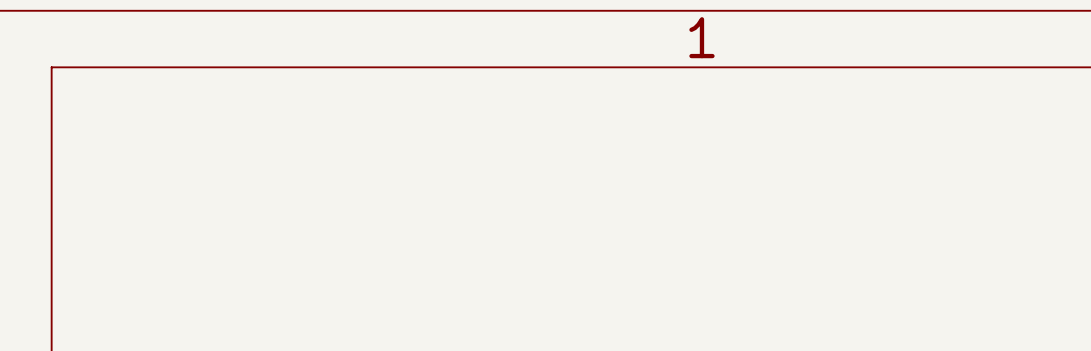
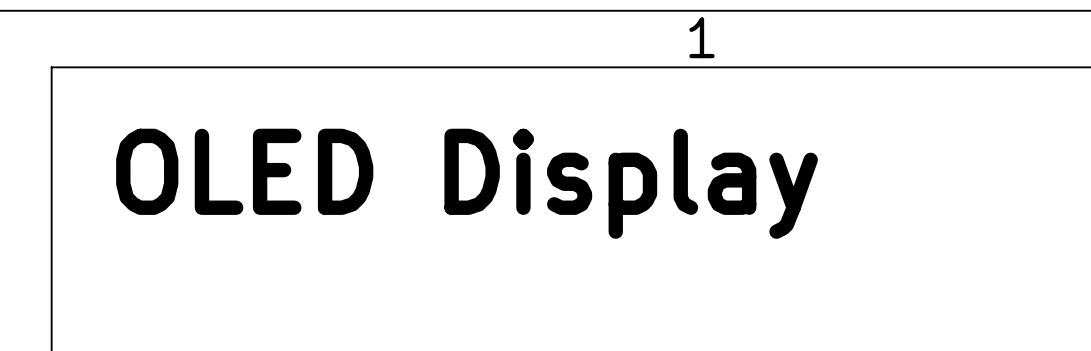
text: none -> OLED Display (467, 183)

